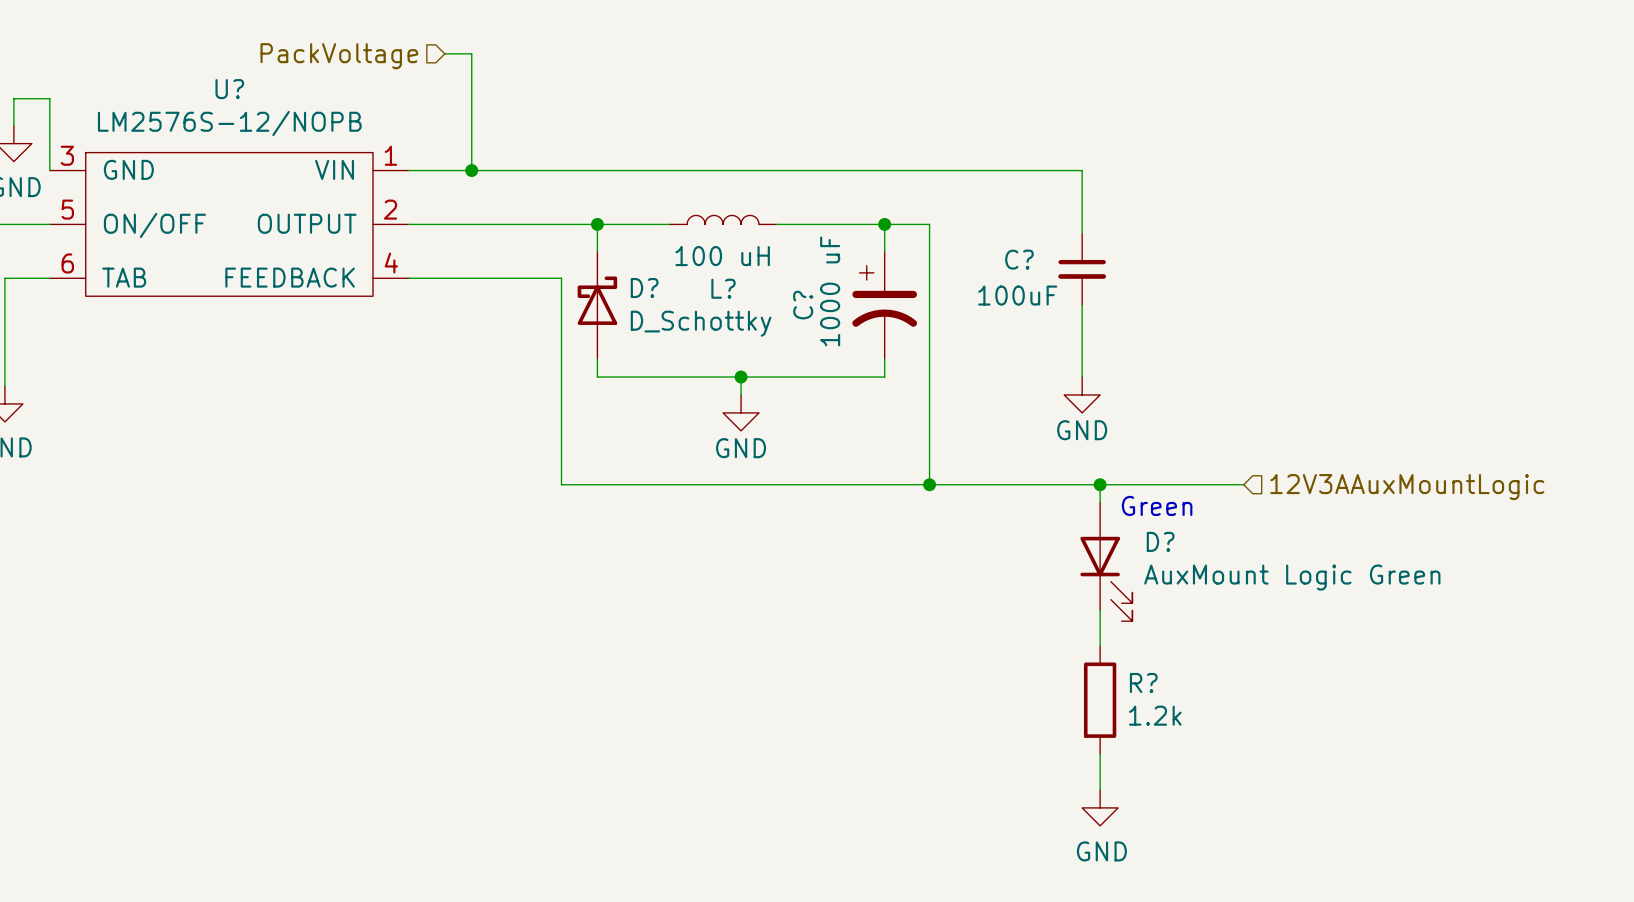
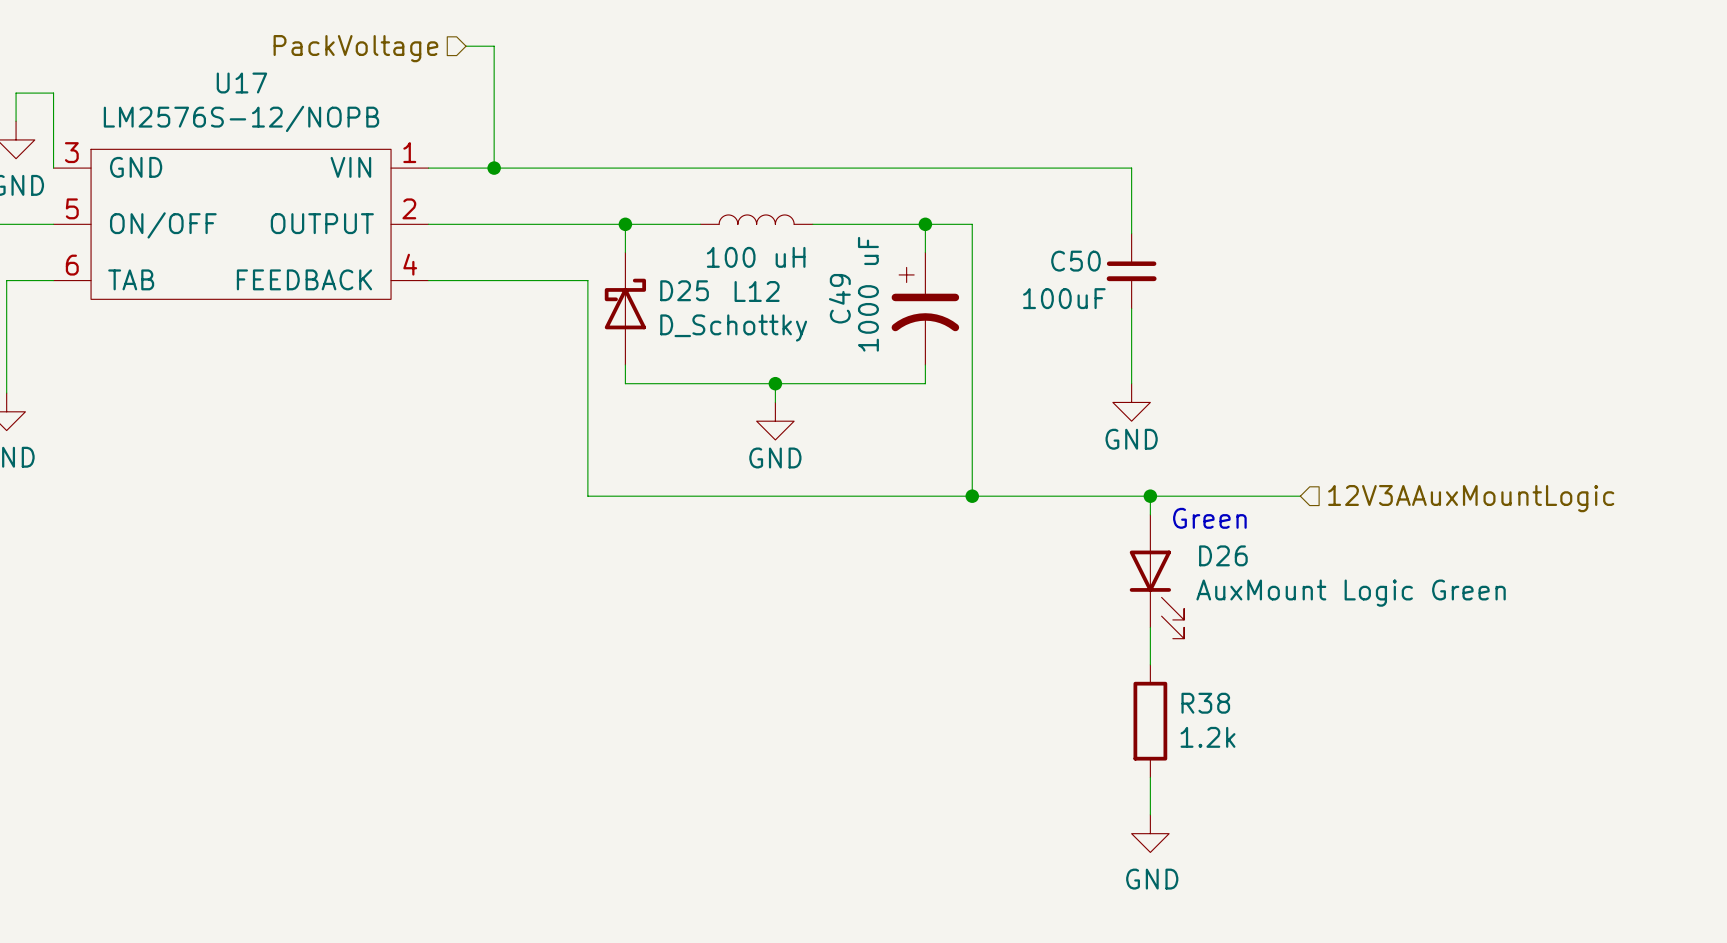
U? name: U? (229, 89) -> U17 (241, 83)
C? name: C? (1019, 259) -> C50 (1075, 261)
D? name: D? (644, 288) -> D25 (684, 290)
L? name: L? (723, 288) -> L12 (757, 291)
C? name: C? (803, 305) -> C49 (839, 298)
D? name: D? (1160, 541) -> D26 (1223, 555)
R? name: R? (1143, 683) -> R38 (1205, 703)

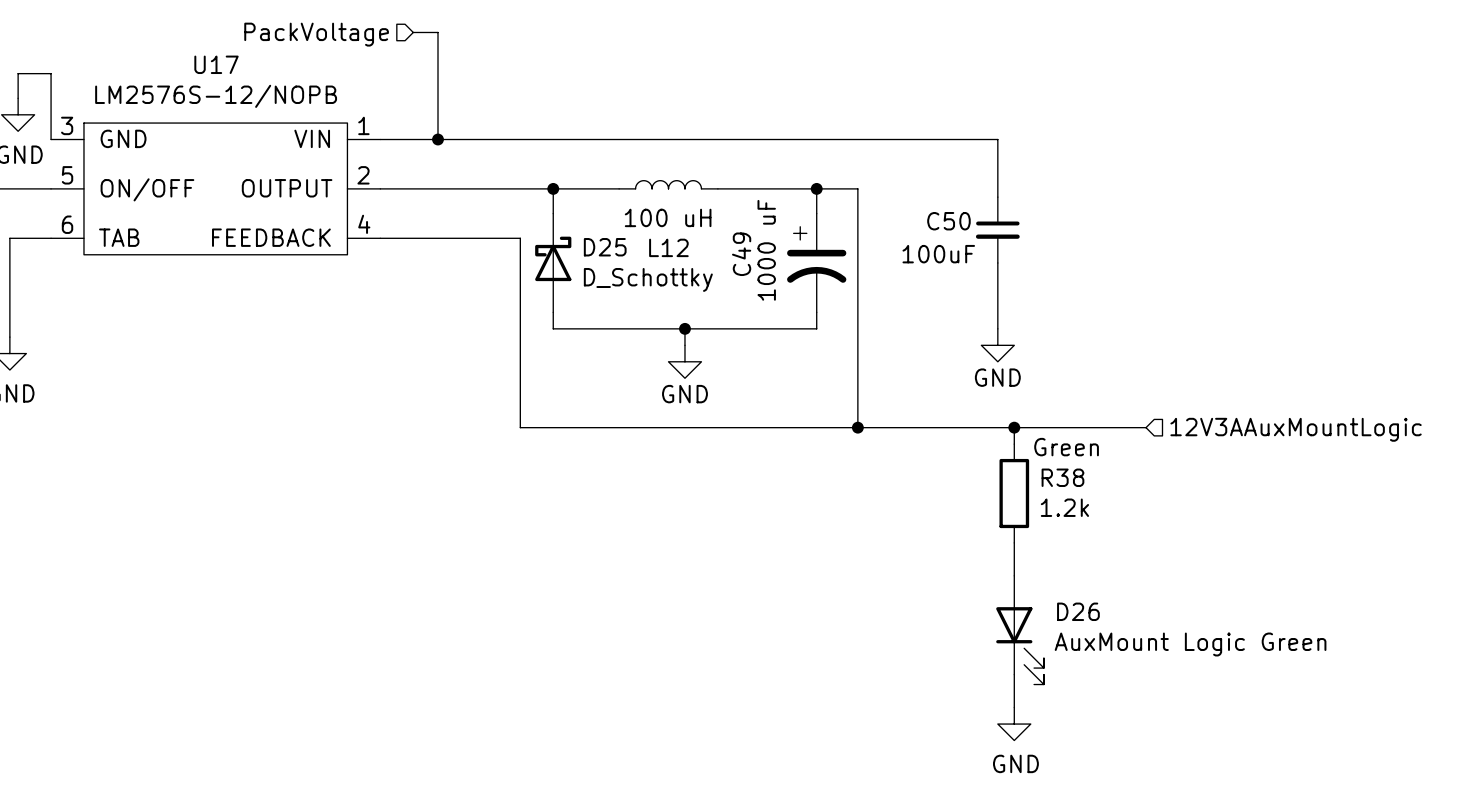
D26 position: (1156, 576) -> (1020, 630)
R38 position: (1150, 721) -> (1014, 493)

